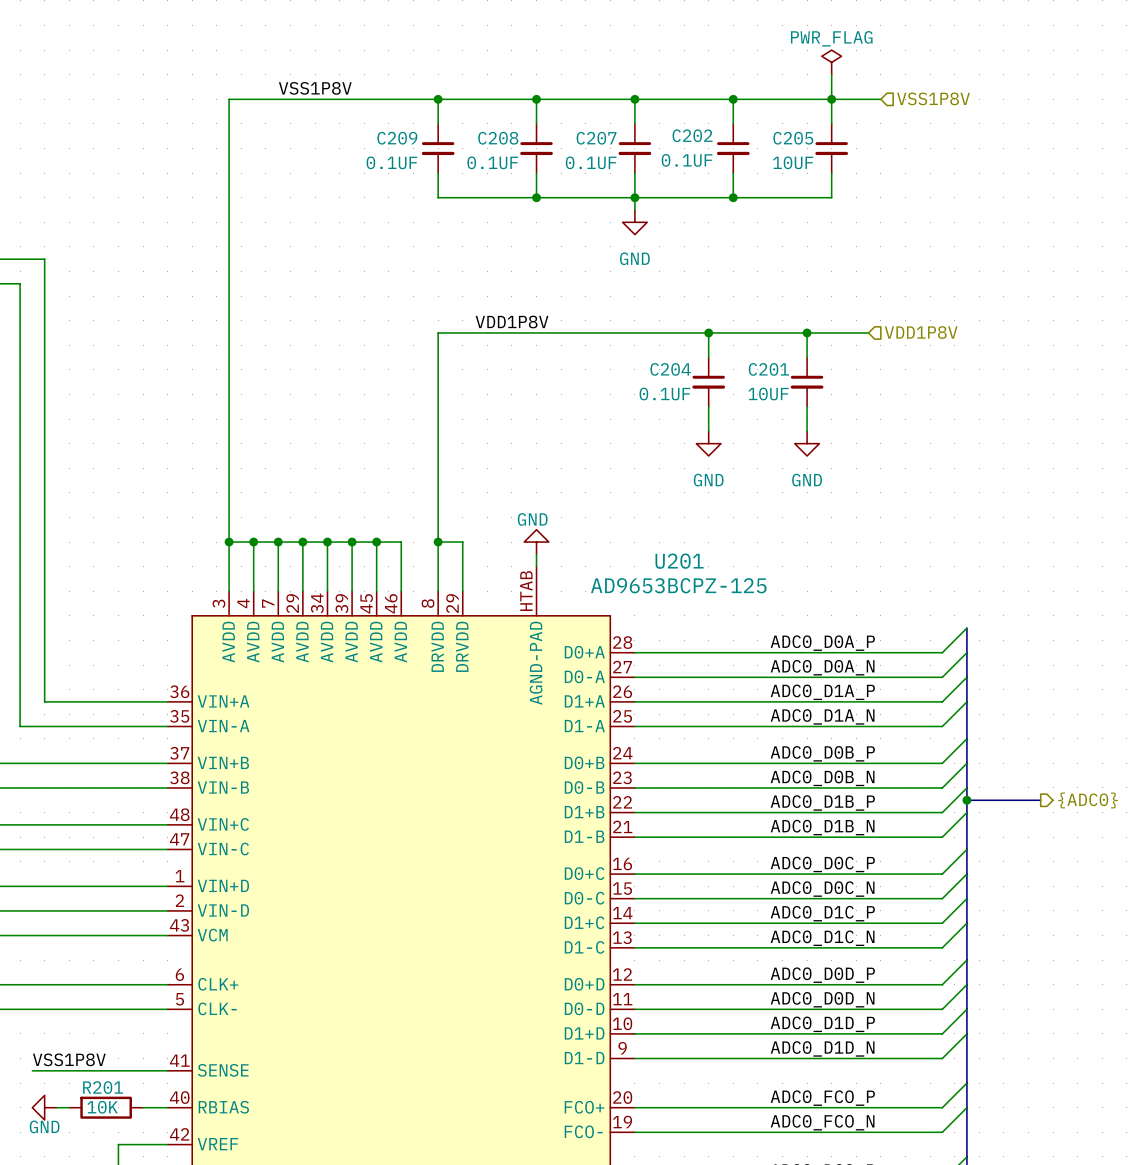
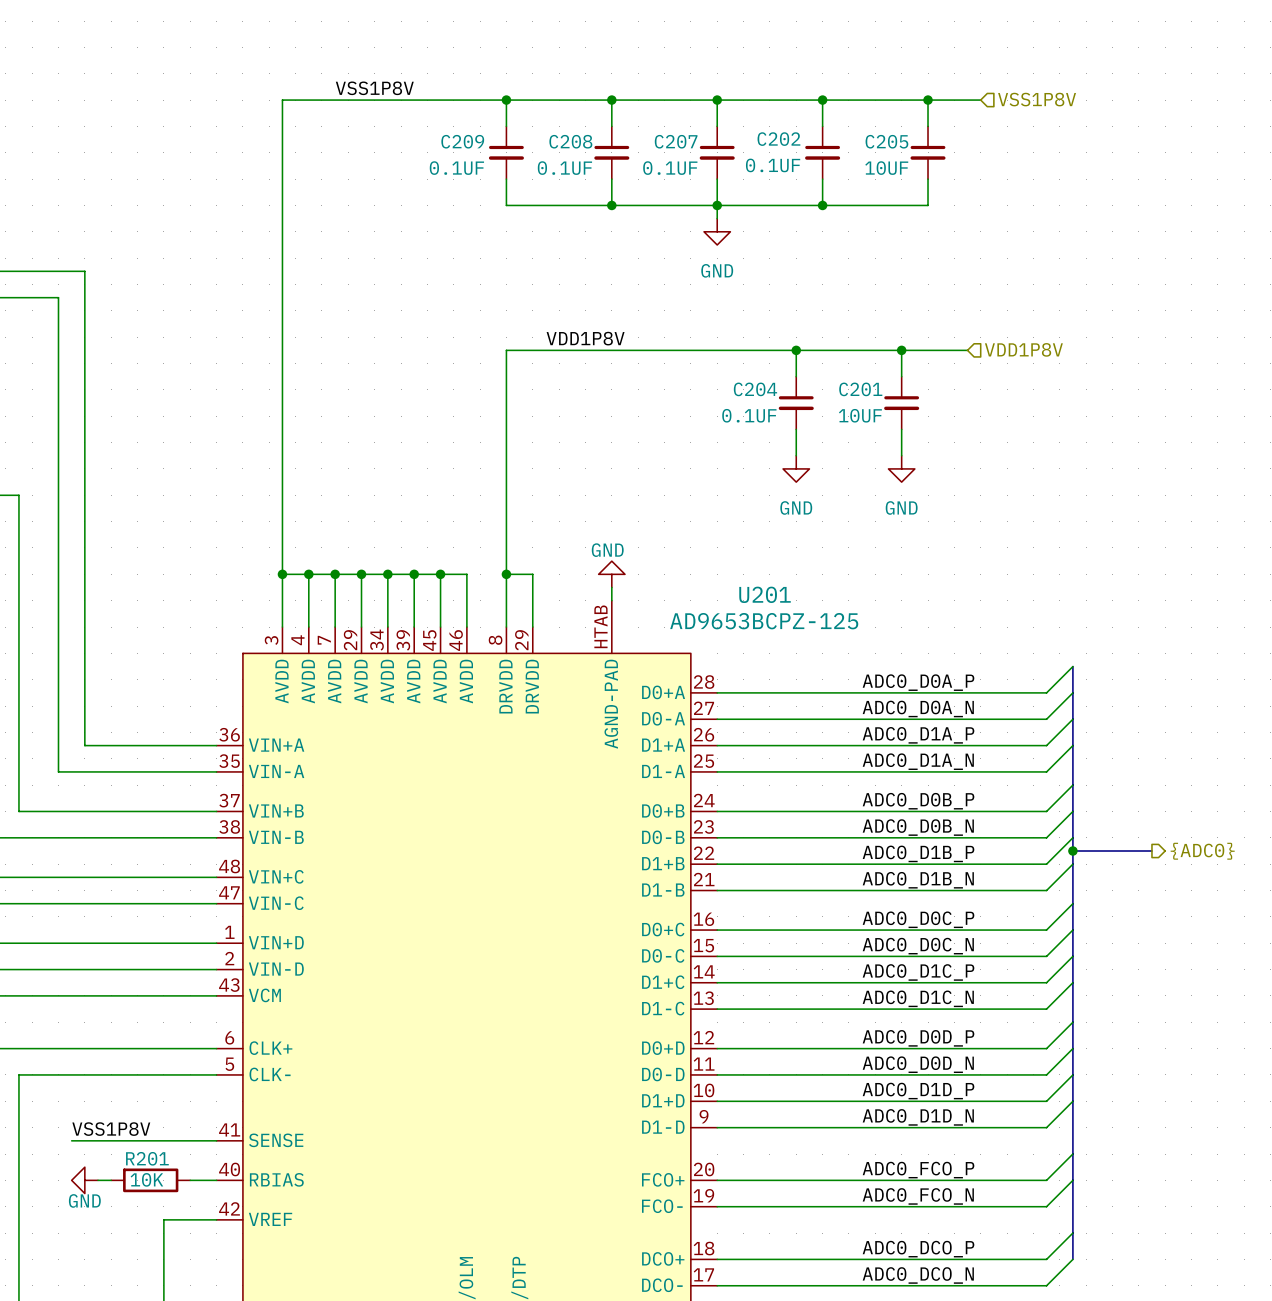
power symbol: PWR_FLAG (831, 62) -> none
wire: (831, 74) (831, 99) -> none

